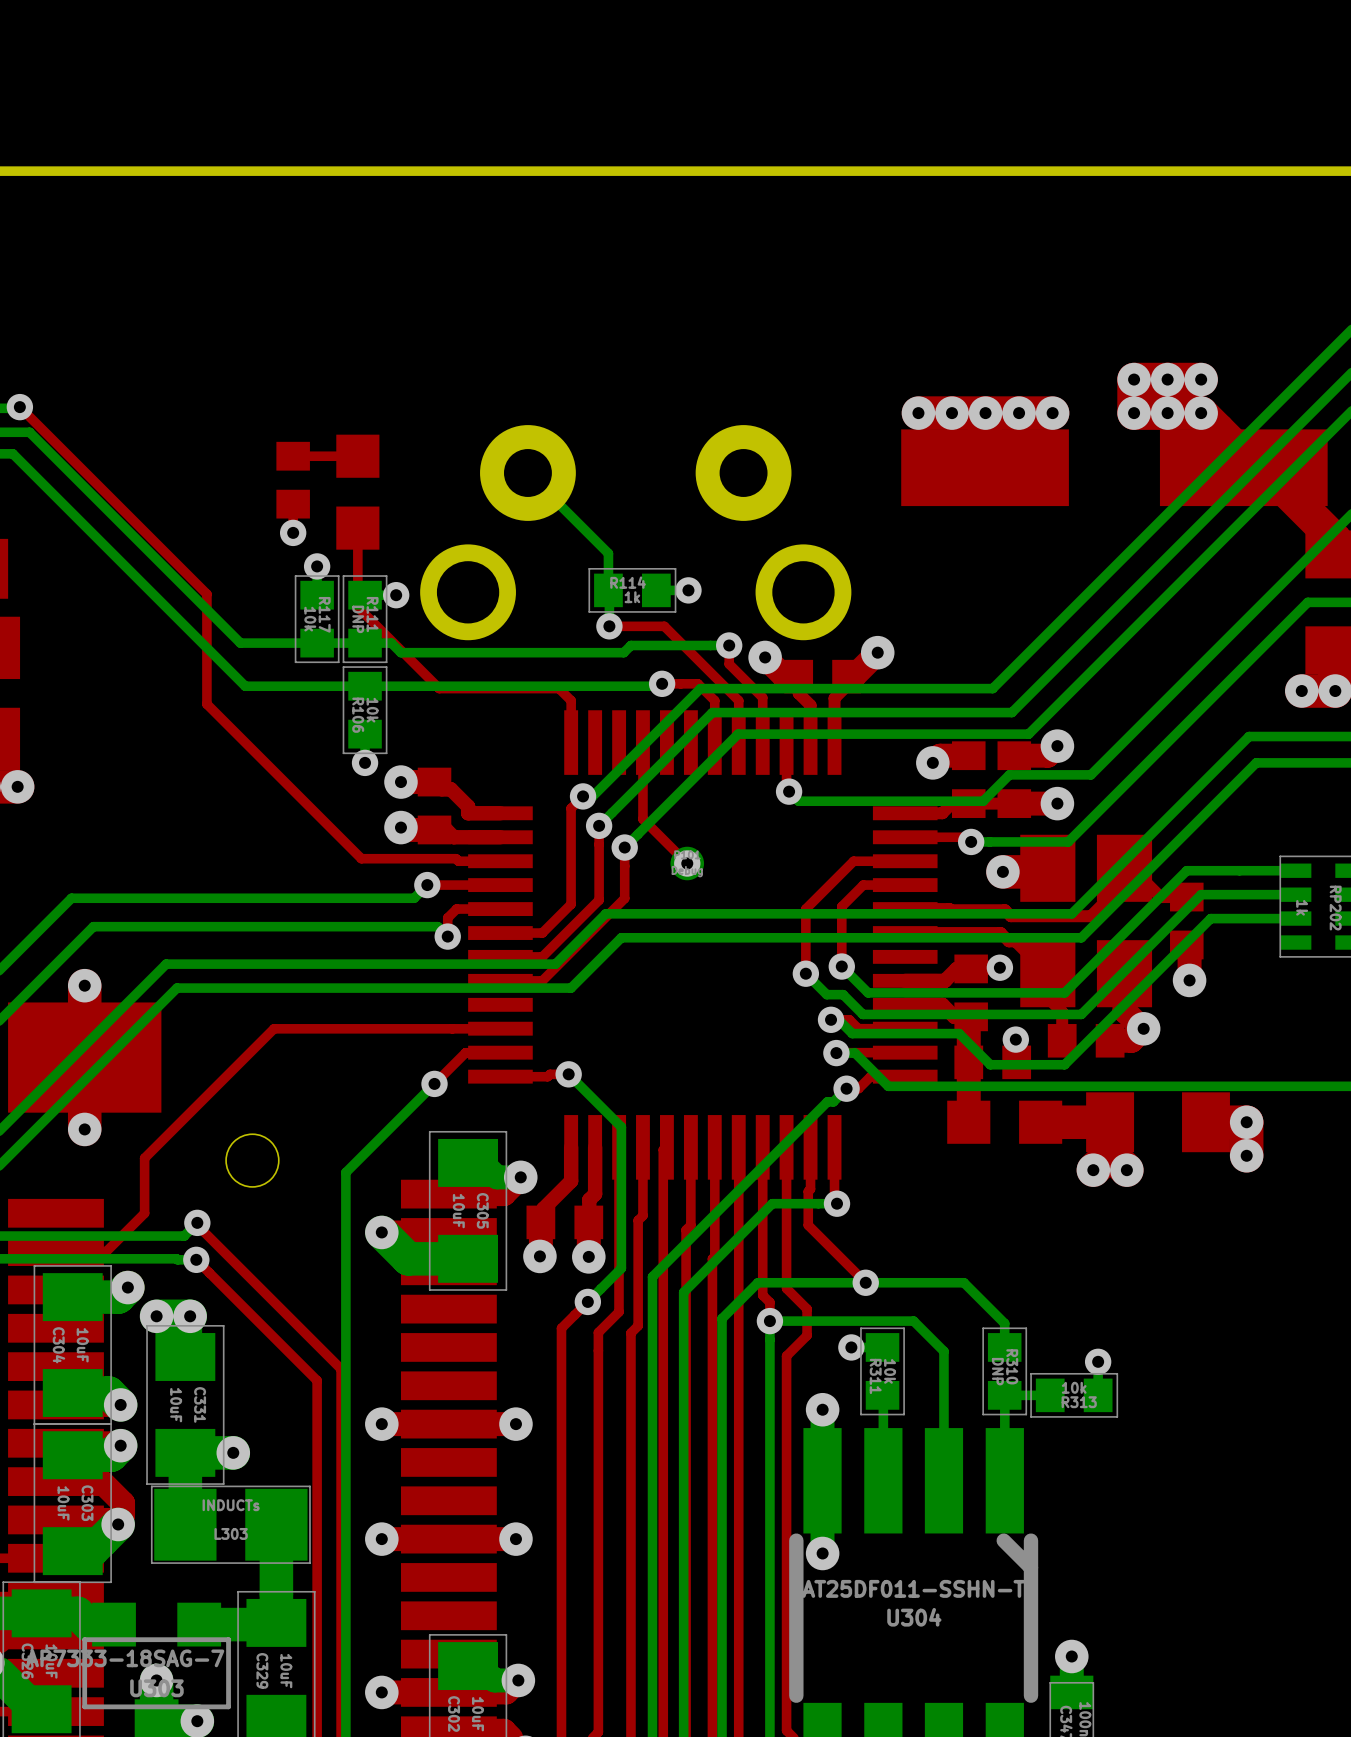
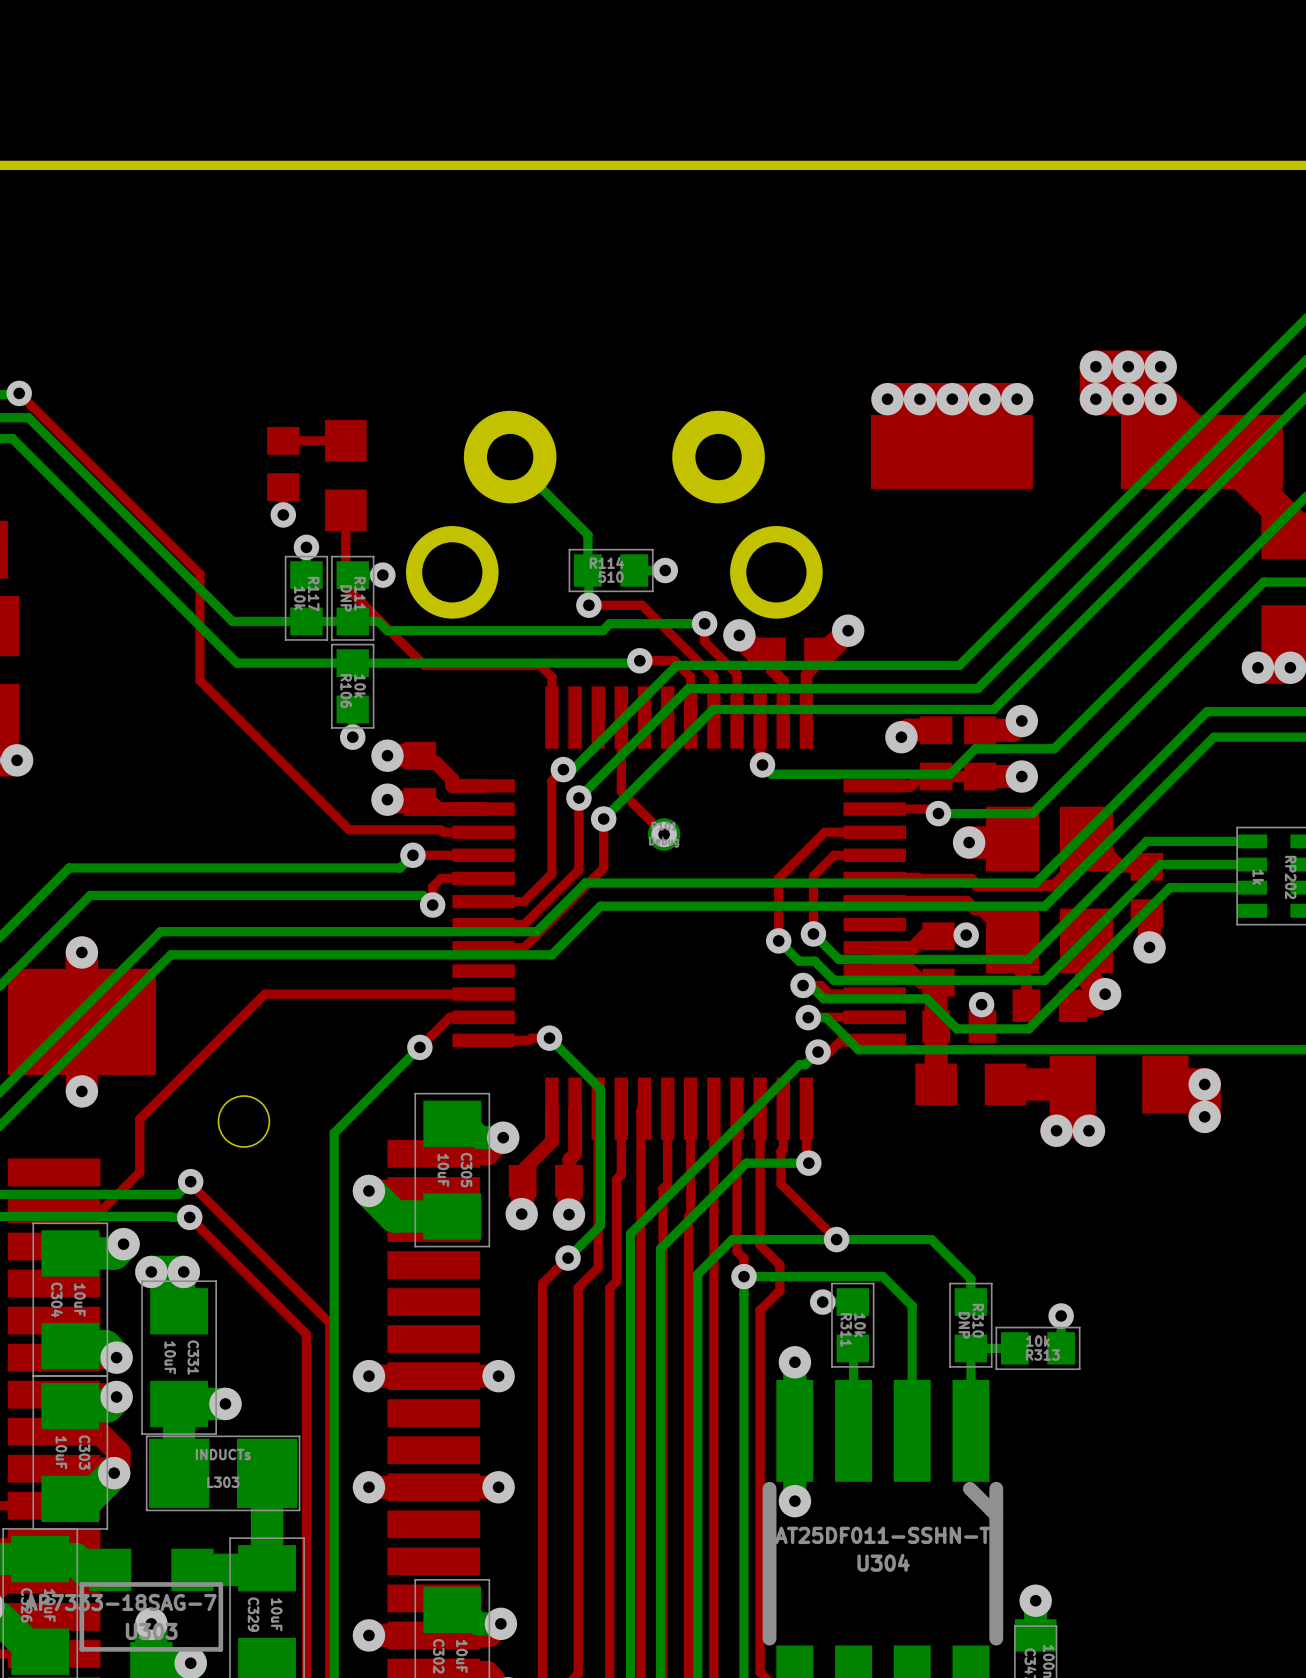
R114 value: 1k (632, 597) -> 510 (611, 577)

